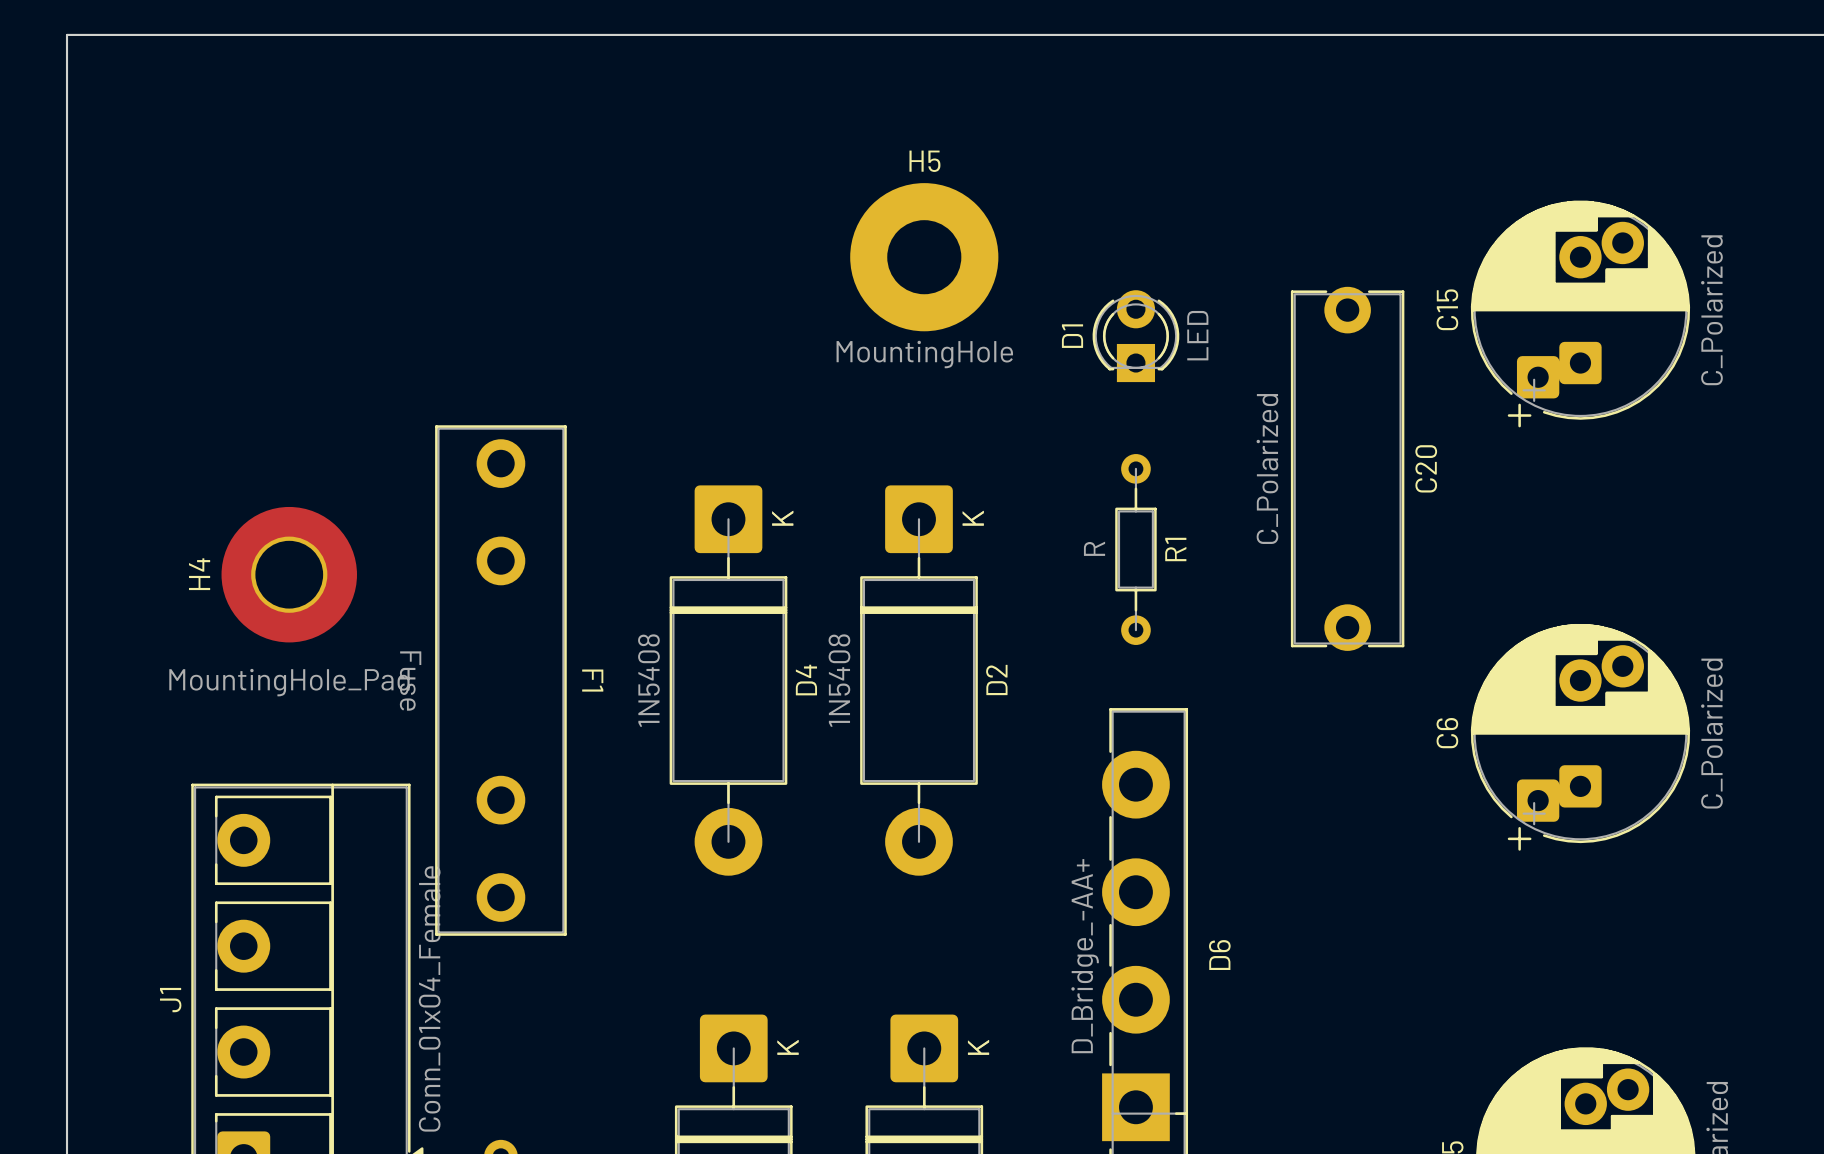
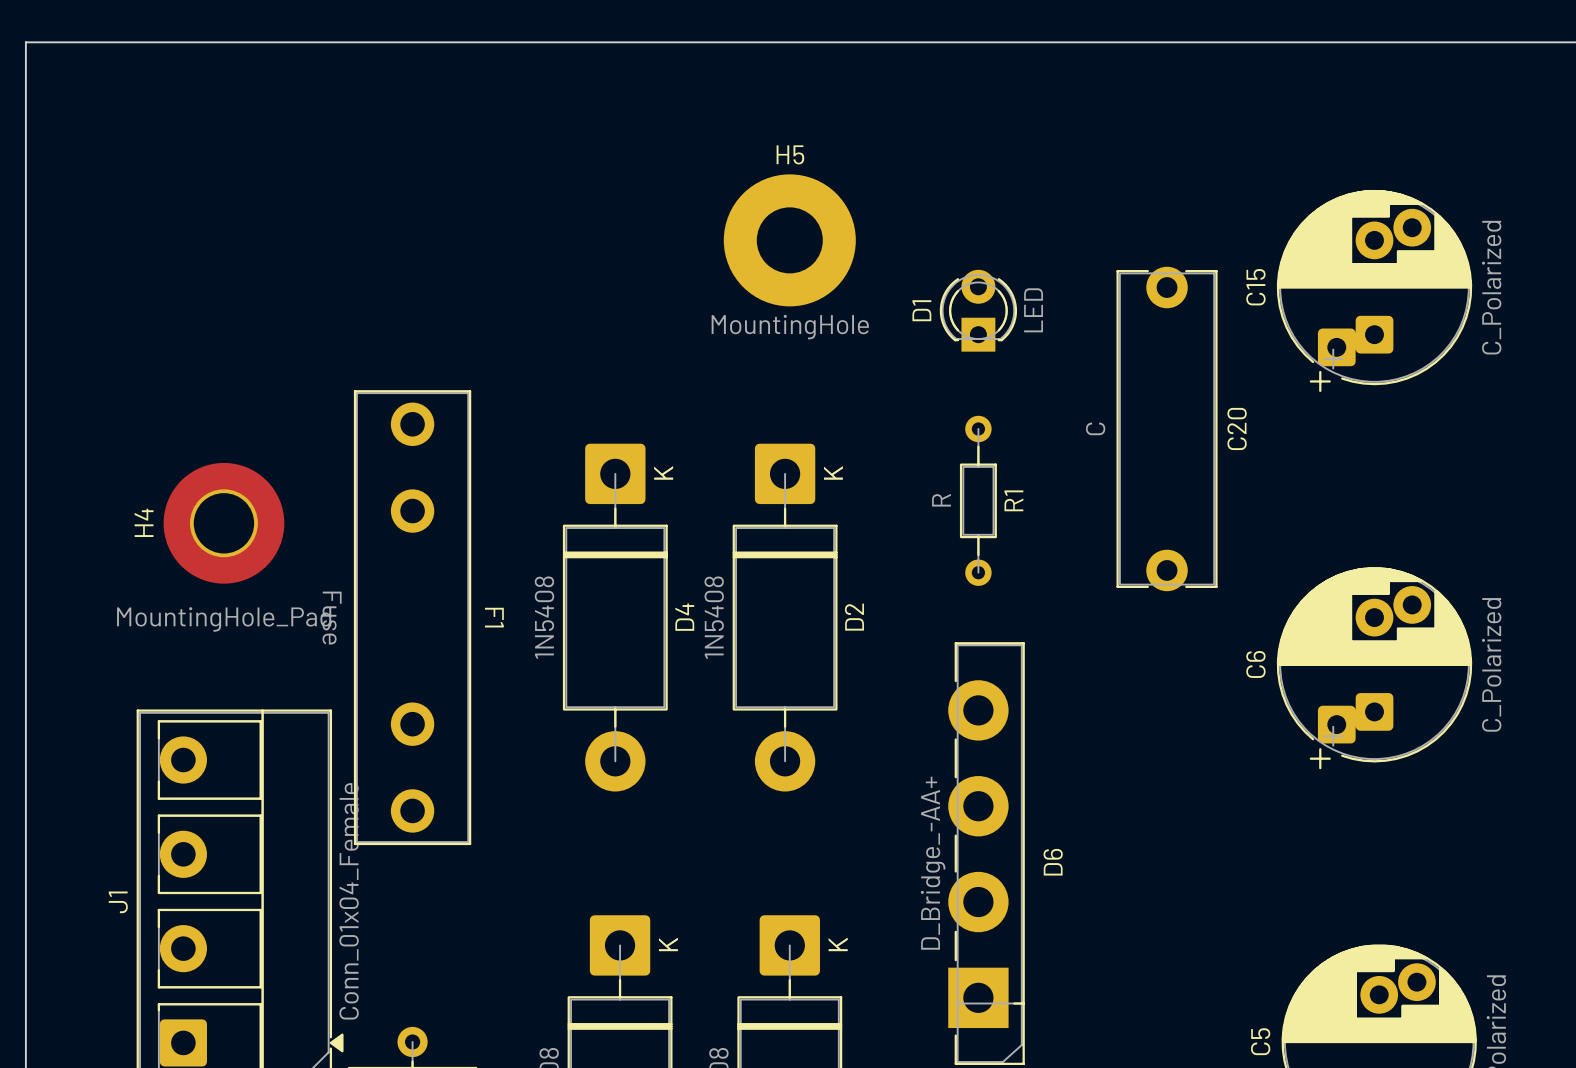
C20 value: C_Polarized (1267, 469) -> C (1095, 428)

